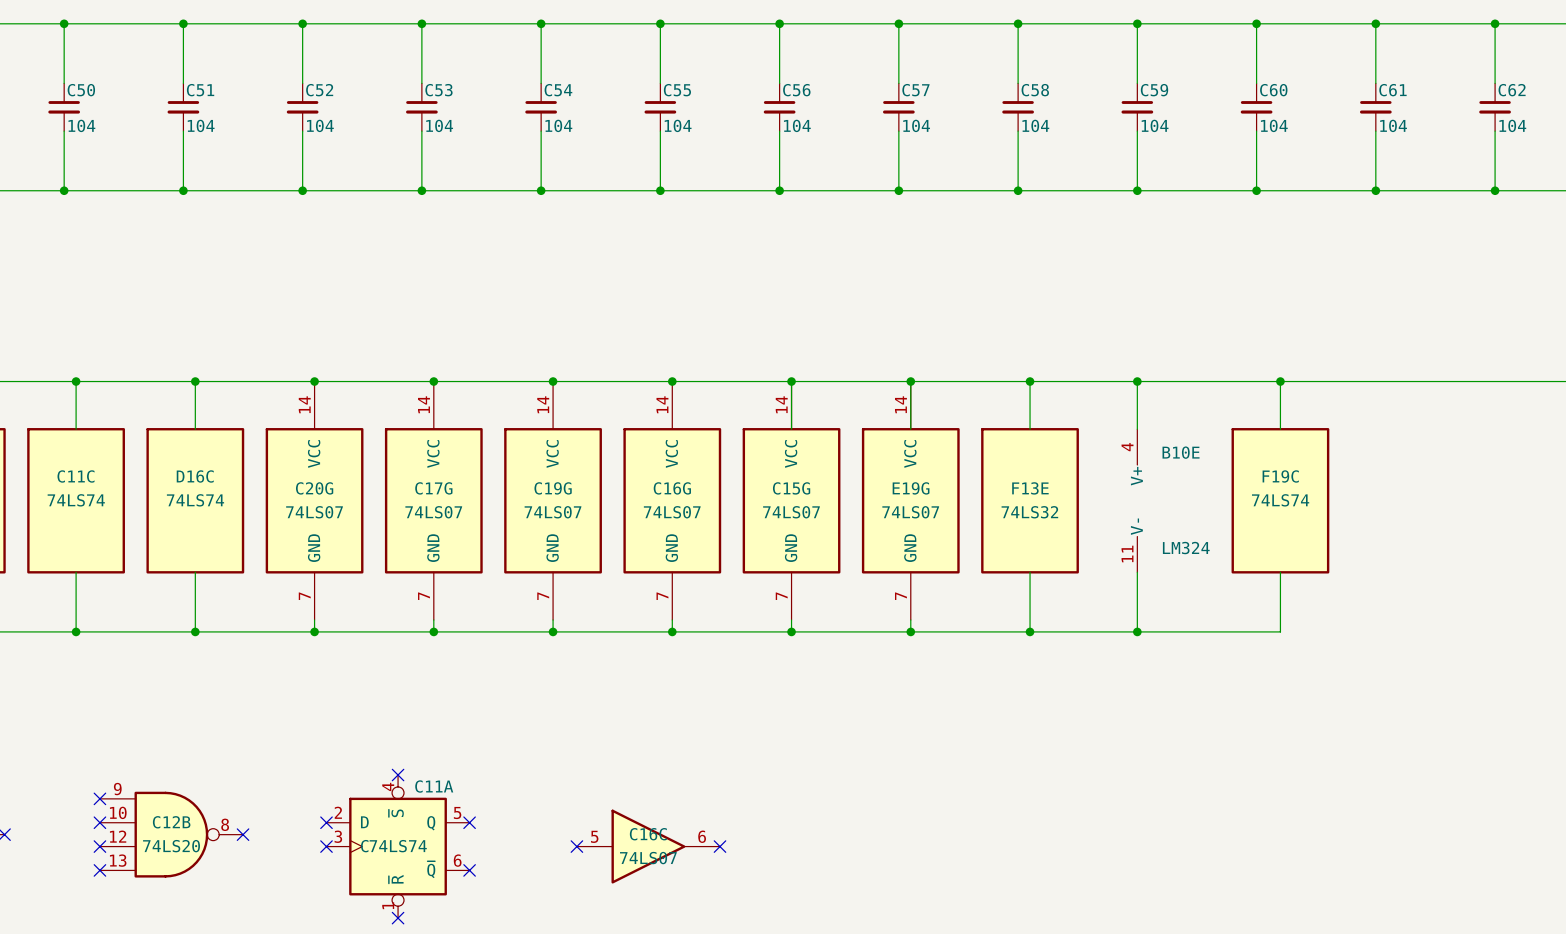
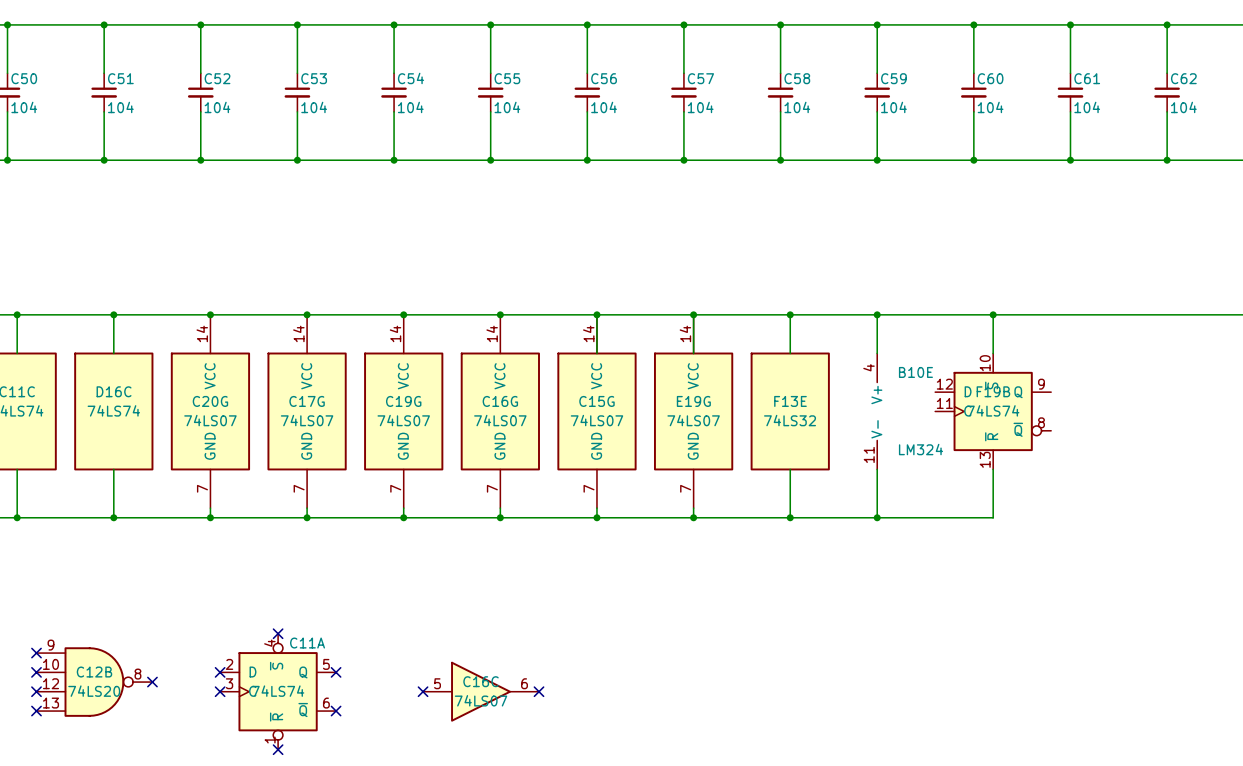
F19C: 74LS74 (1280, 500) -> none
F19B: none -> 74LS74 (993, 411)

